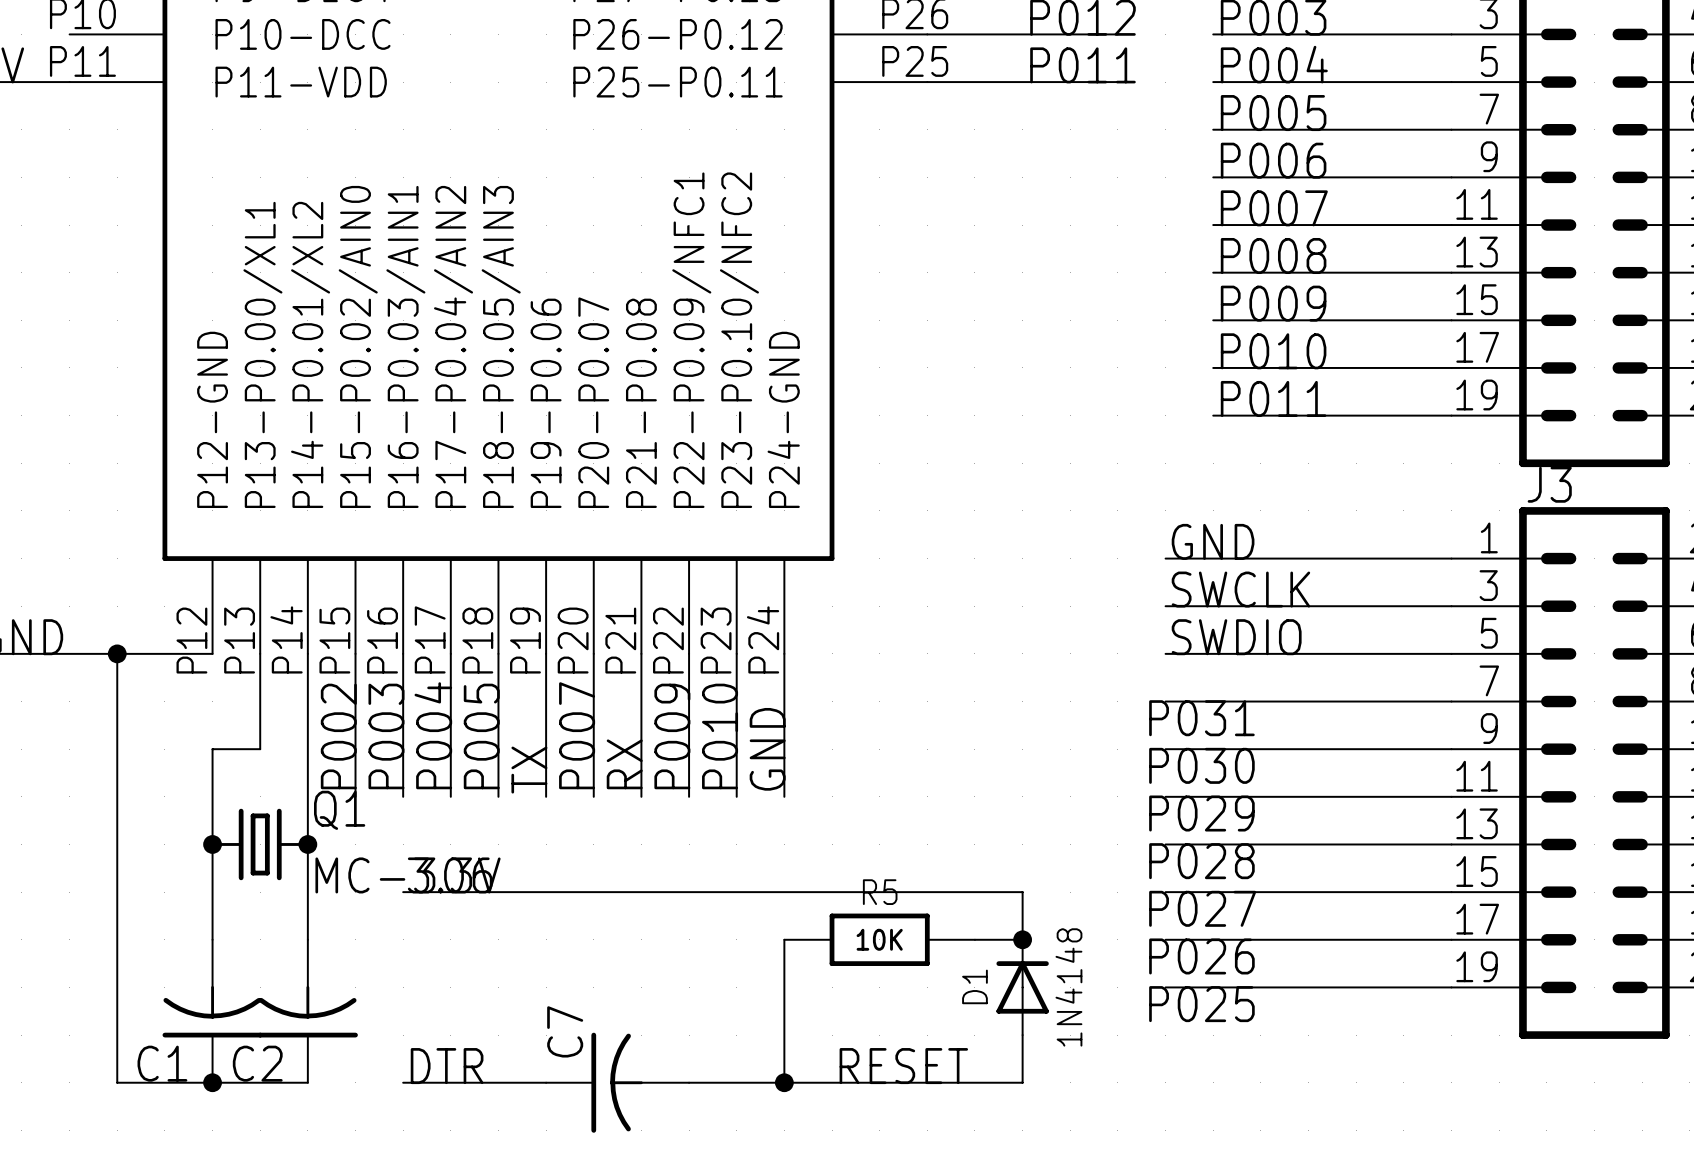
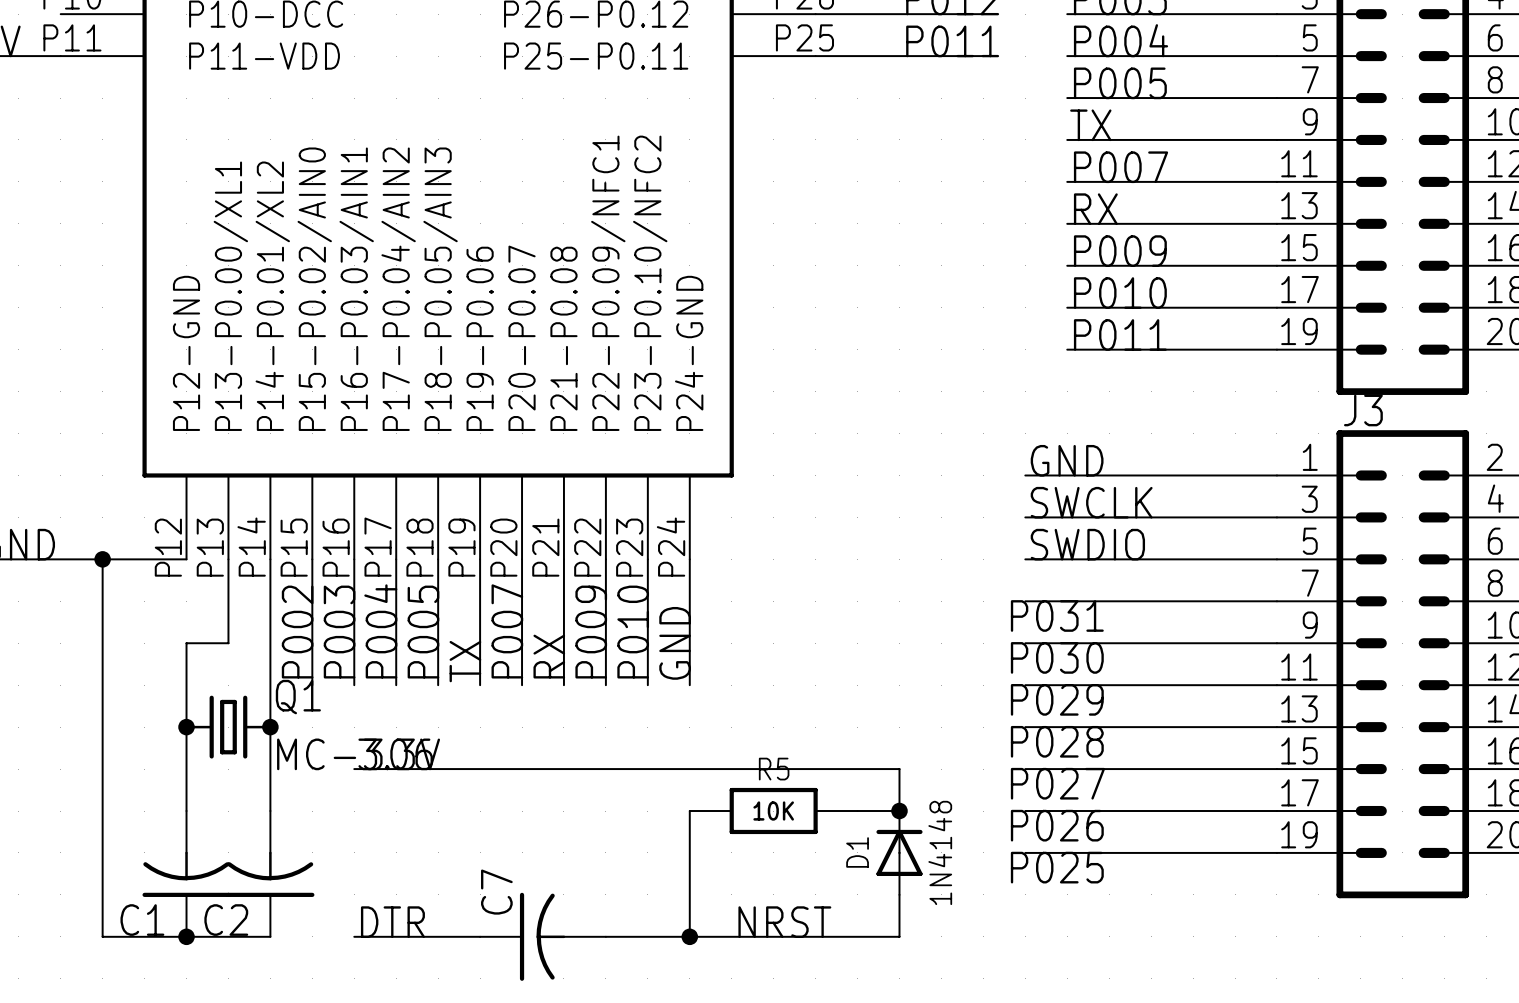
label: P006 (1273, 160) -> TX (1090, 125)
label: P008 (1273, 255) -> RX (1095, 209)
label: RESET (903, 1066) -> NRST (784, 922)

